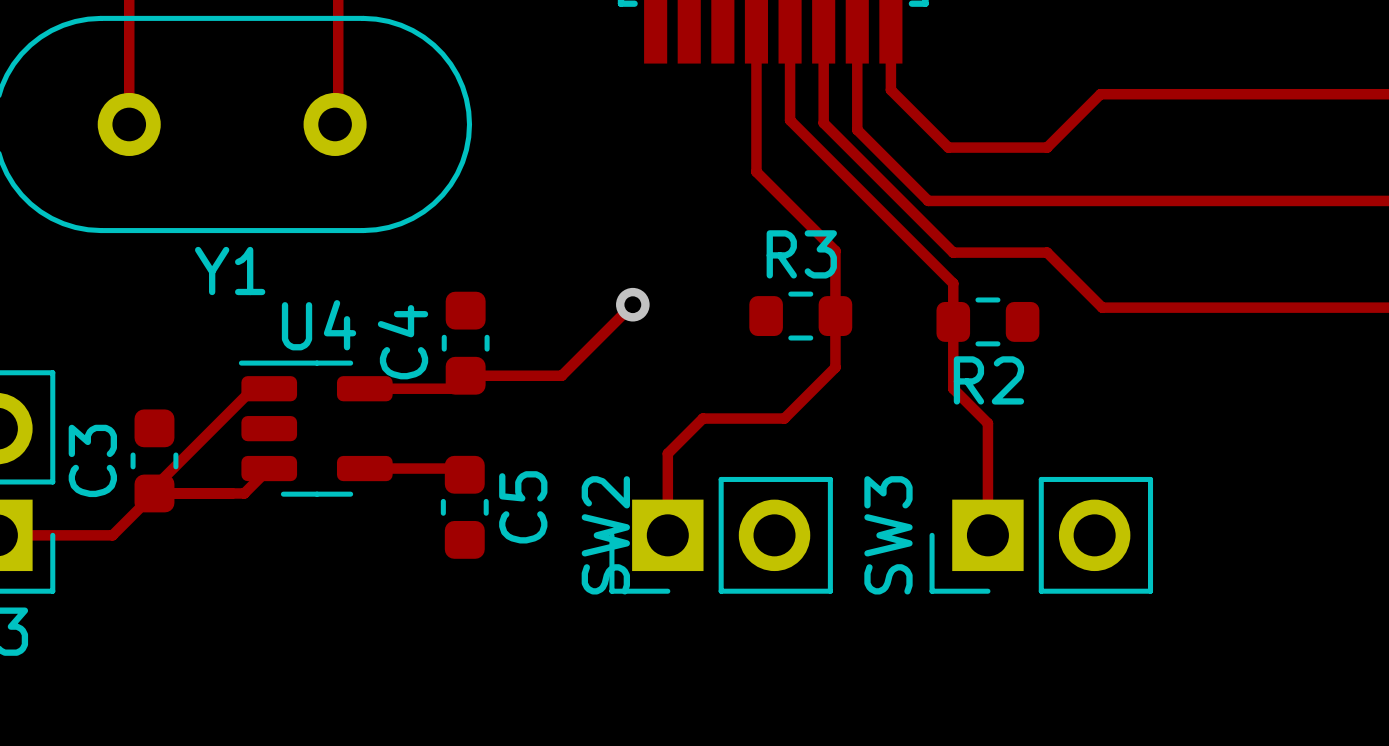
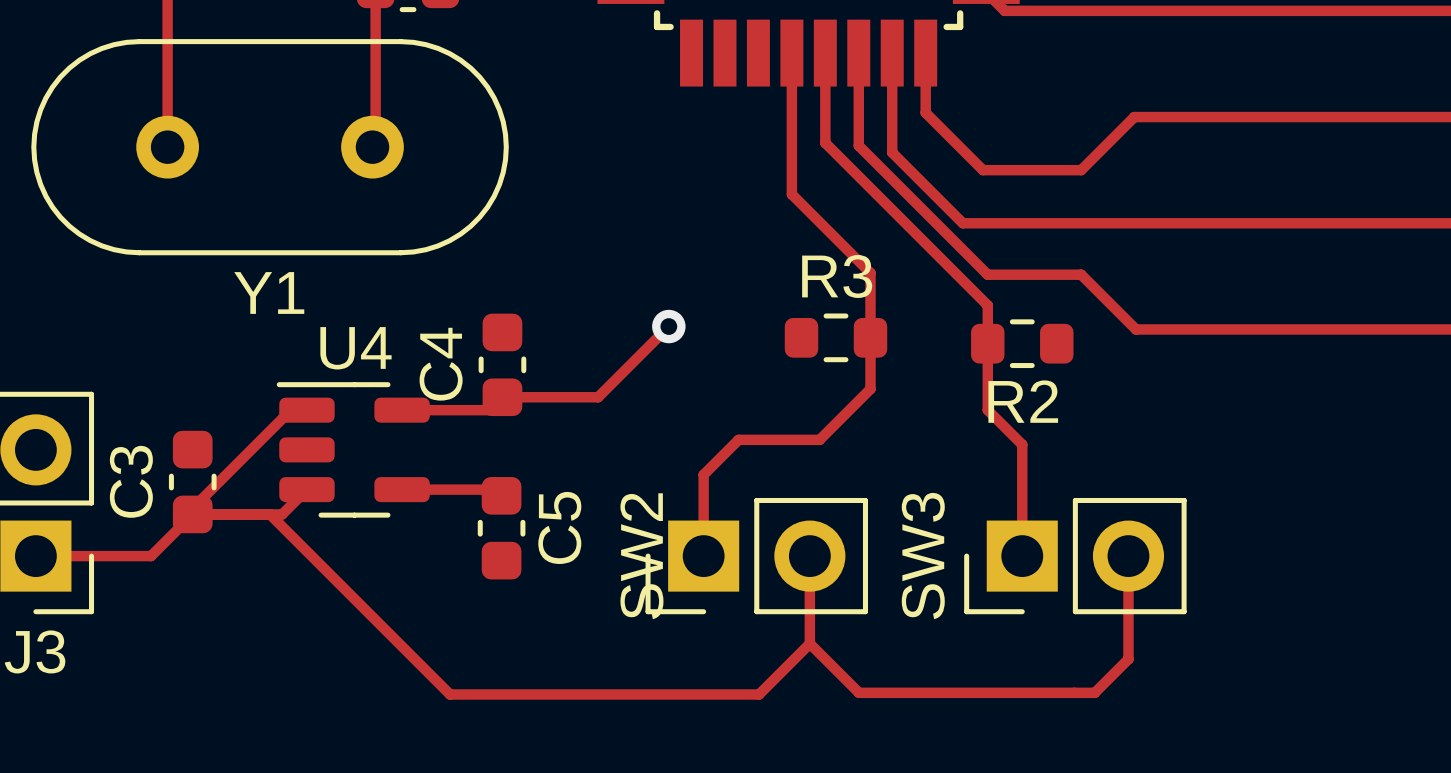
track: none -> (269, 514) (450, 694) (759, 694) (809, 643)
track: none -> (809, 556) (809, 643)
track: none -> (1128, 556) (1128, 659) (1094, 692) (859, 692) (809, 643)

